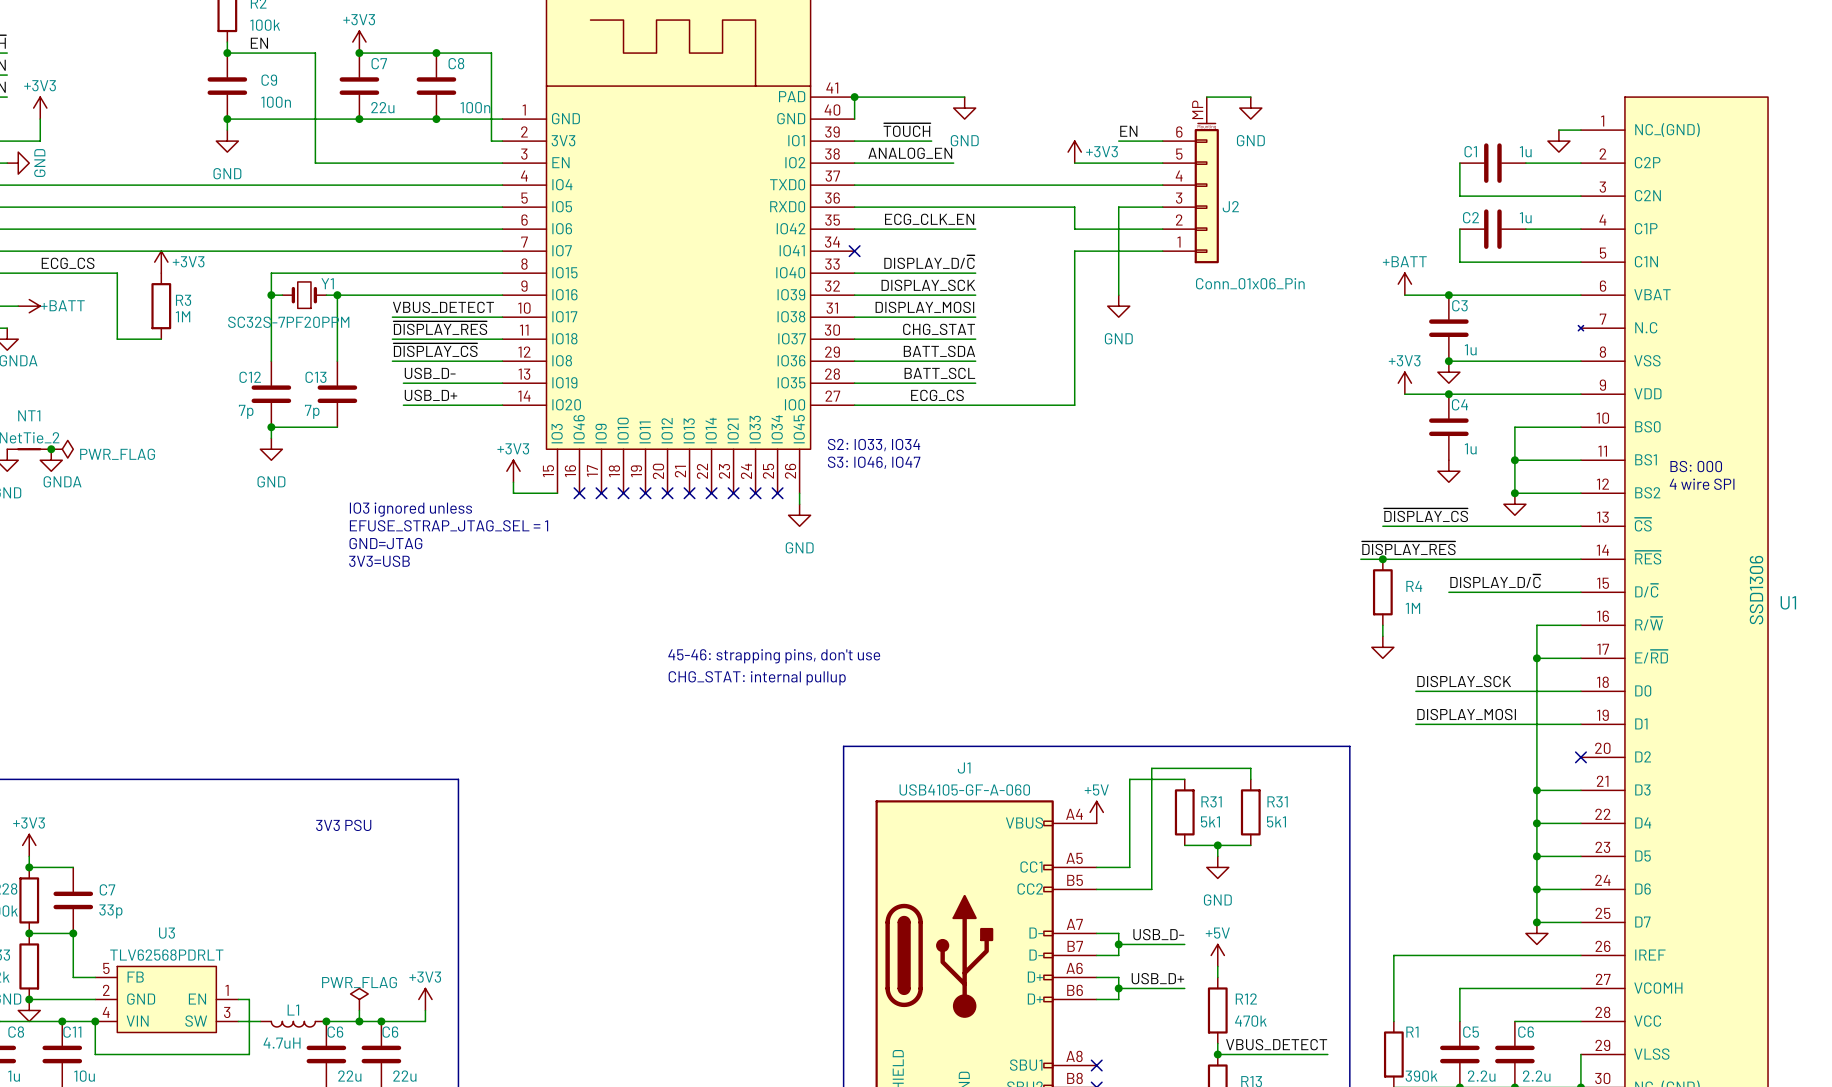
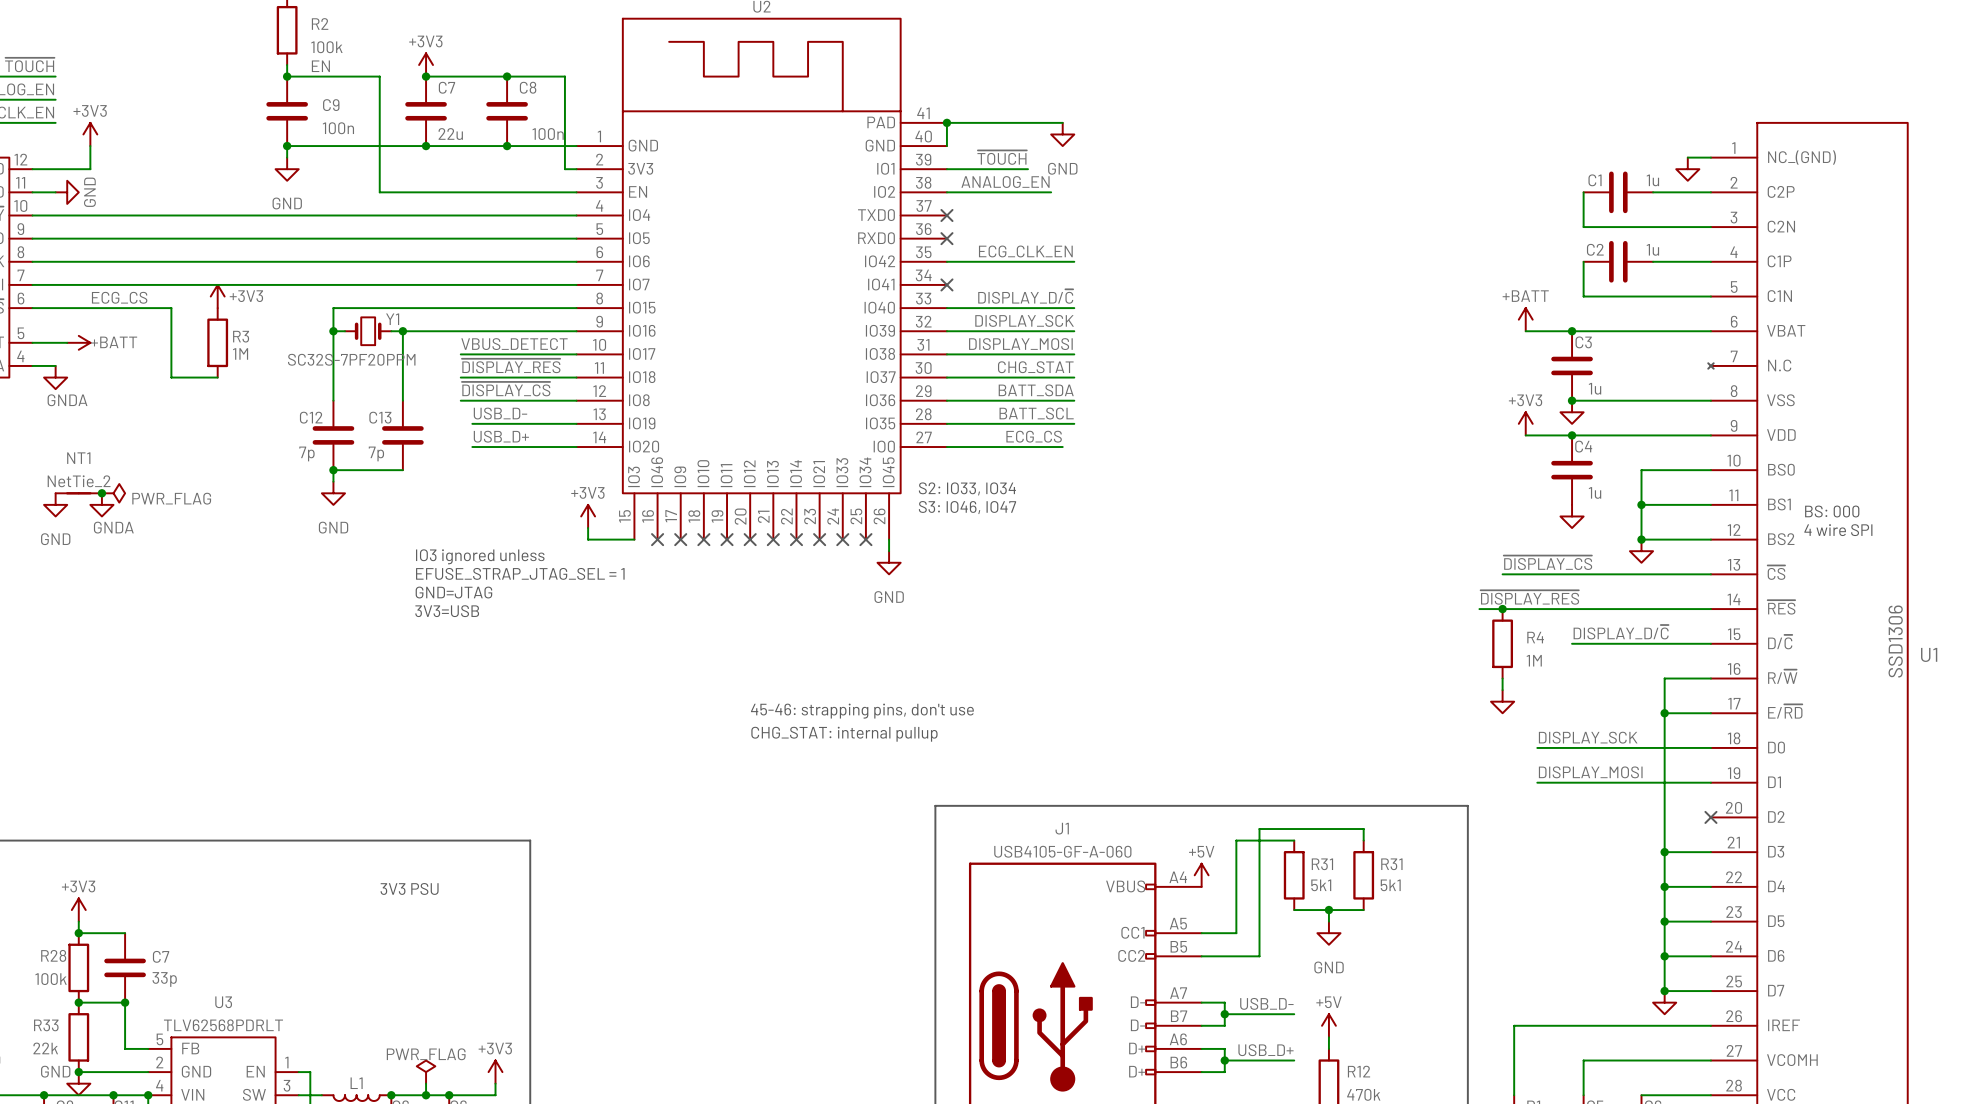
wire: (1206, 97) (1250, 97) -> none
power symbol: GND (1250, 108) -> none
label: EN (1128, 131) -> none
wire: (1118, 141) (1162, 141) -> none
power symbol: +3V3 (1074, 152) -> none
wire: (1074, 163) (1162, 163) -> none
J2: Conn_01x06_Pin (1190, 180) -> none
wire: (854, 185) (1162, 185) -> none
no-connect mark: none -> (946, 215)
wire: (854, 207) (1074, 207) (1074, 229) (1162, 229) -> none
no-connect mark: none -> (946, 238)
wire: (1162, 207) (1118, 207) (1118, 295) -> none
wire: (1162, 251) (1074, 251) (1074, 405) (964, 405) -> none
power symbol: GND (1118, 306) -> none

